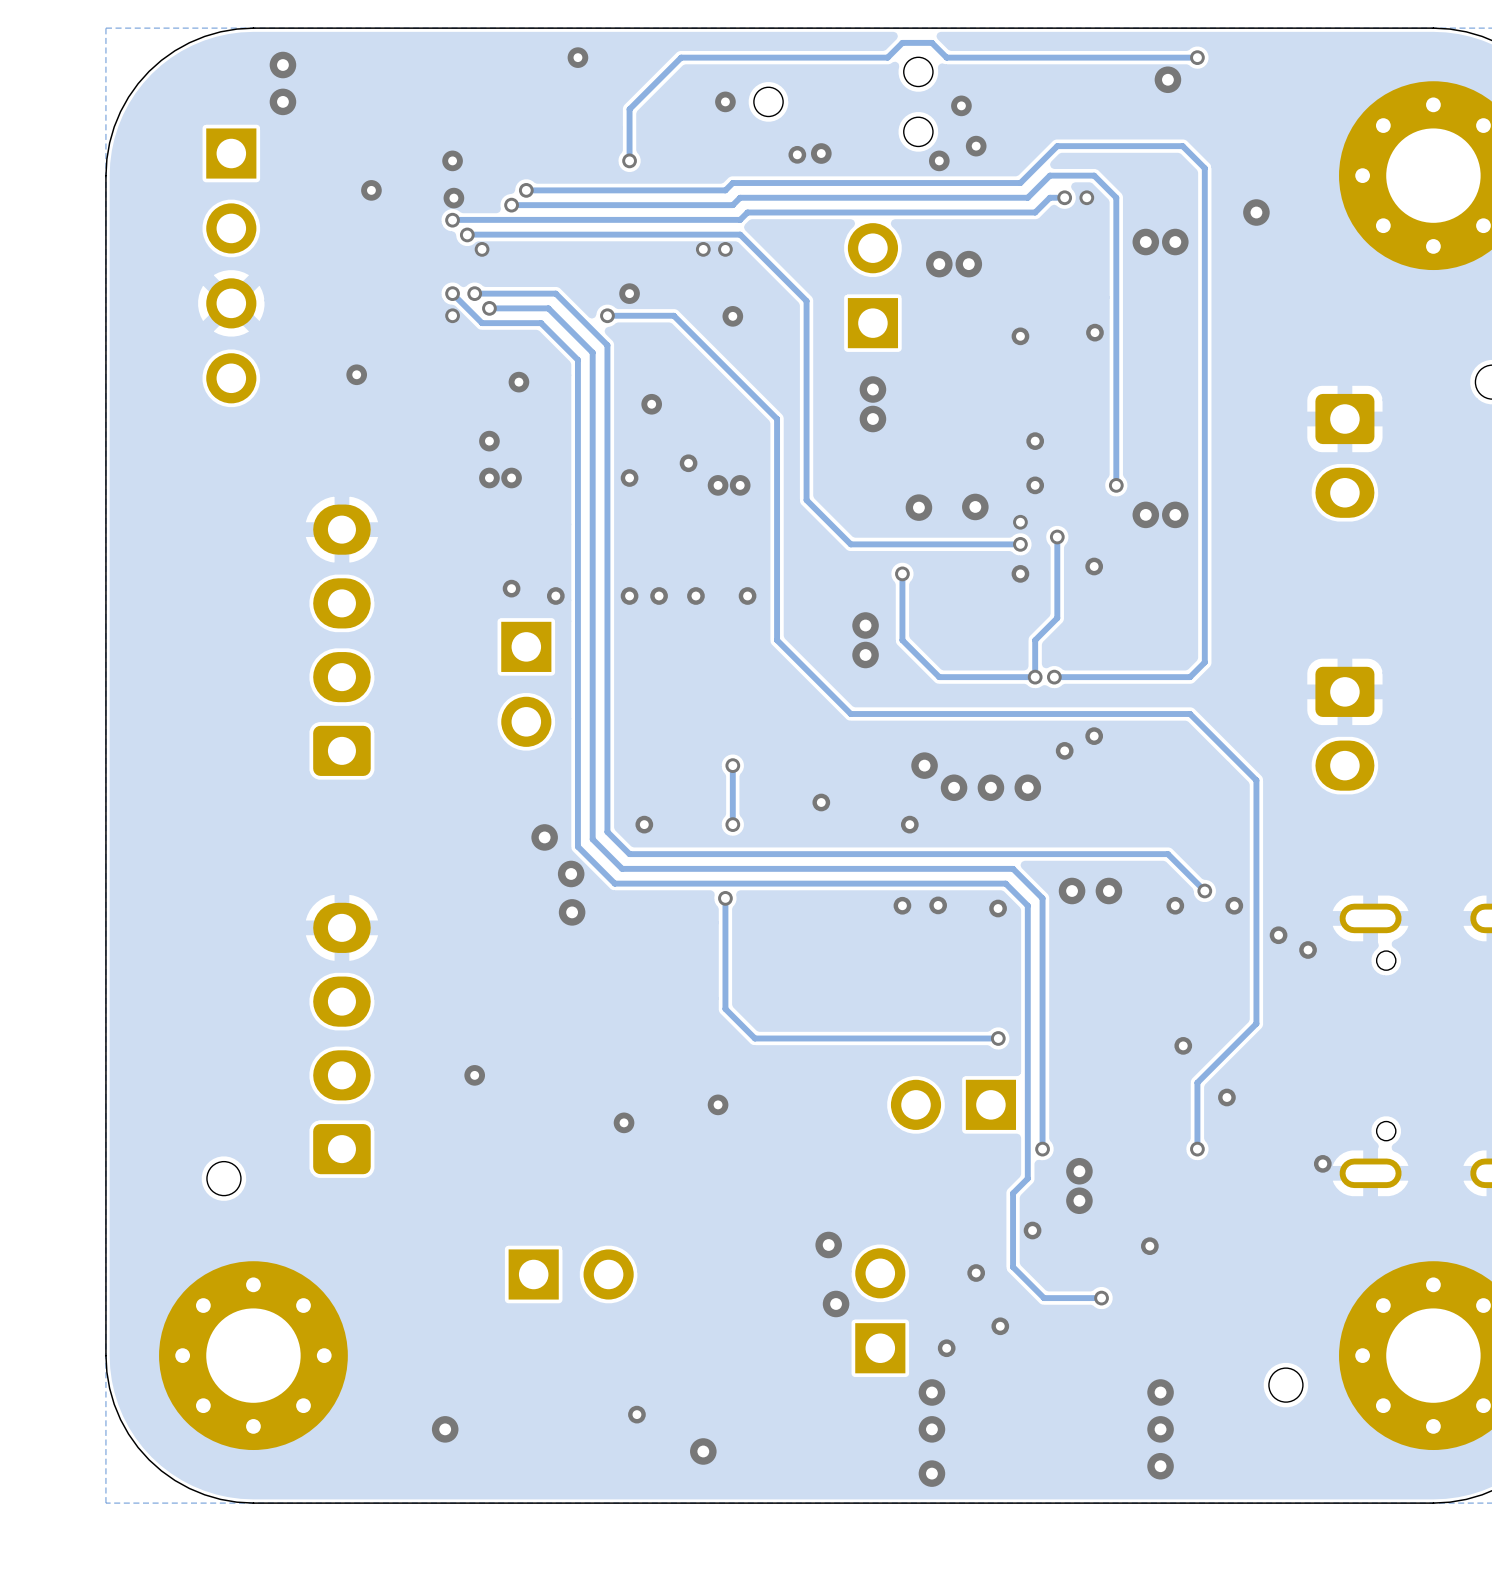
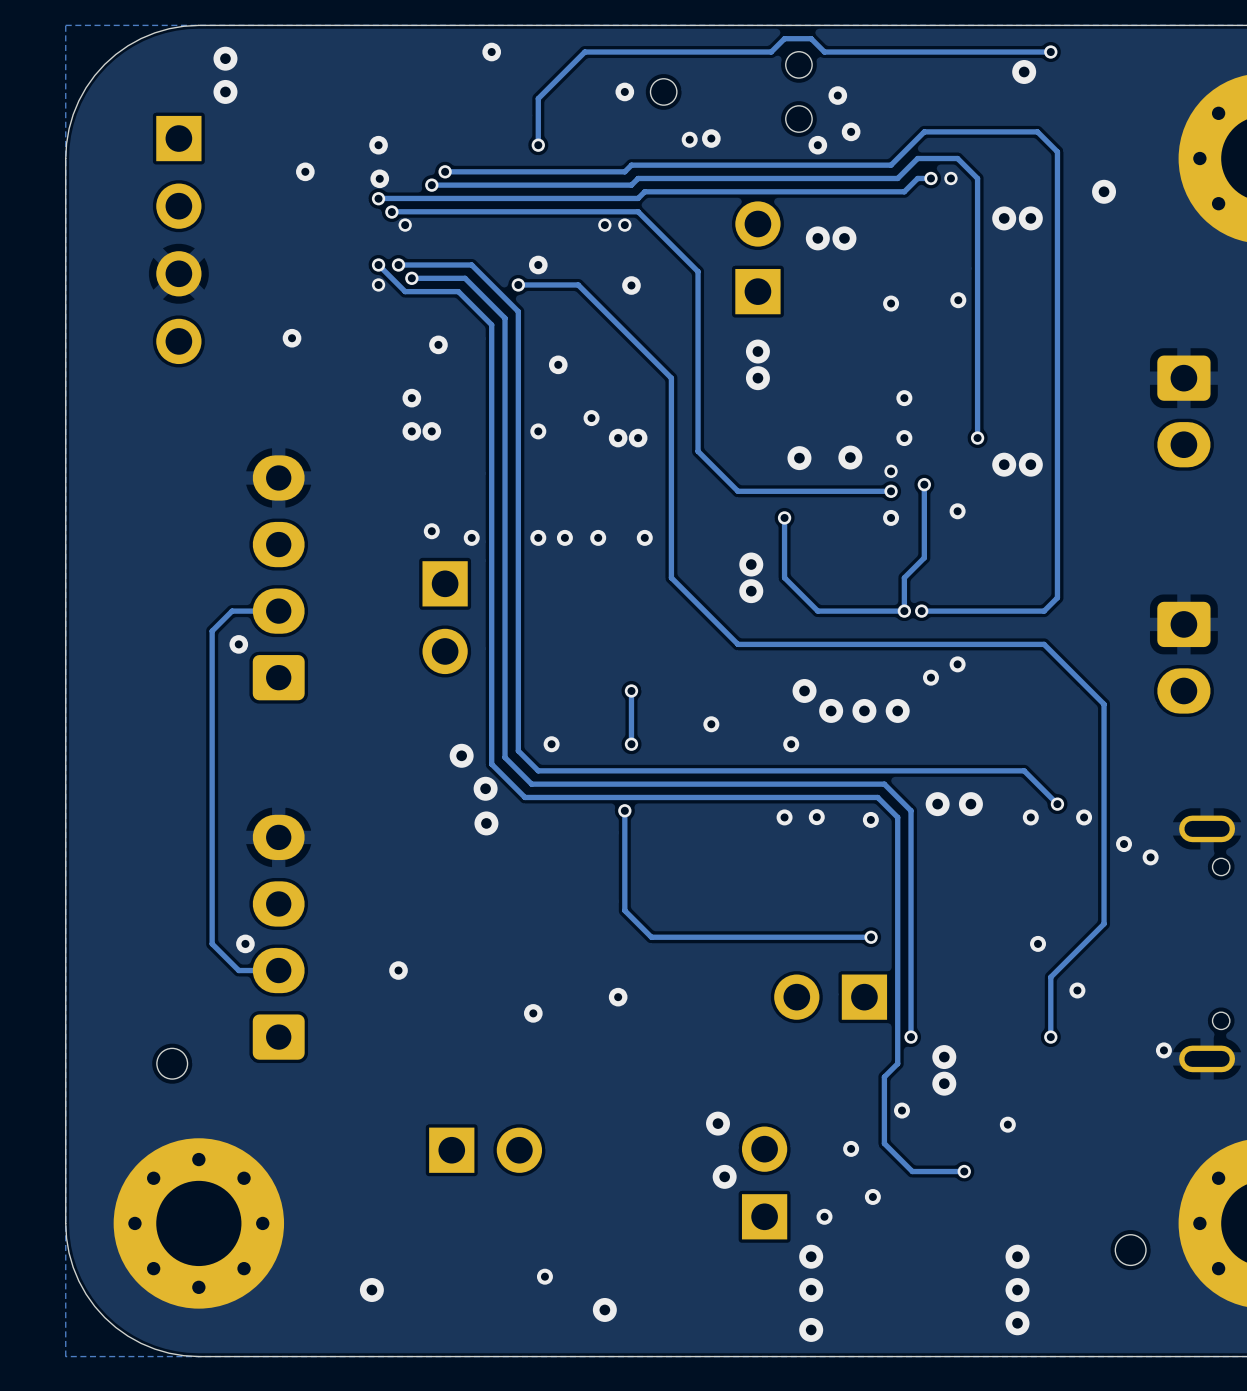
track: none -> (278, 611) (232, 611) (212, 631) (212, 943) (238, 970) (278, 970)
via: none -> (238, 644)
via: none -> (245, 943)

